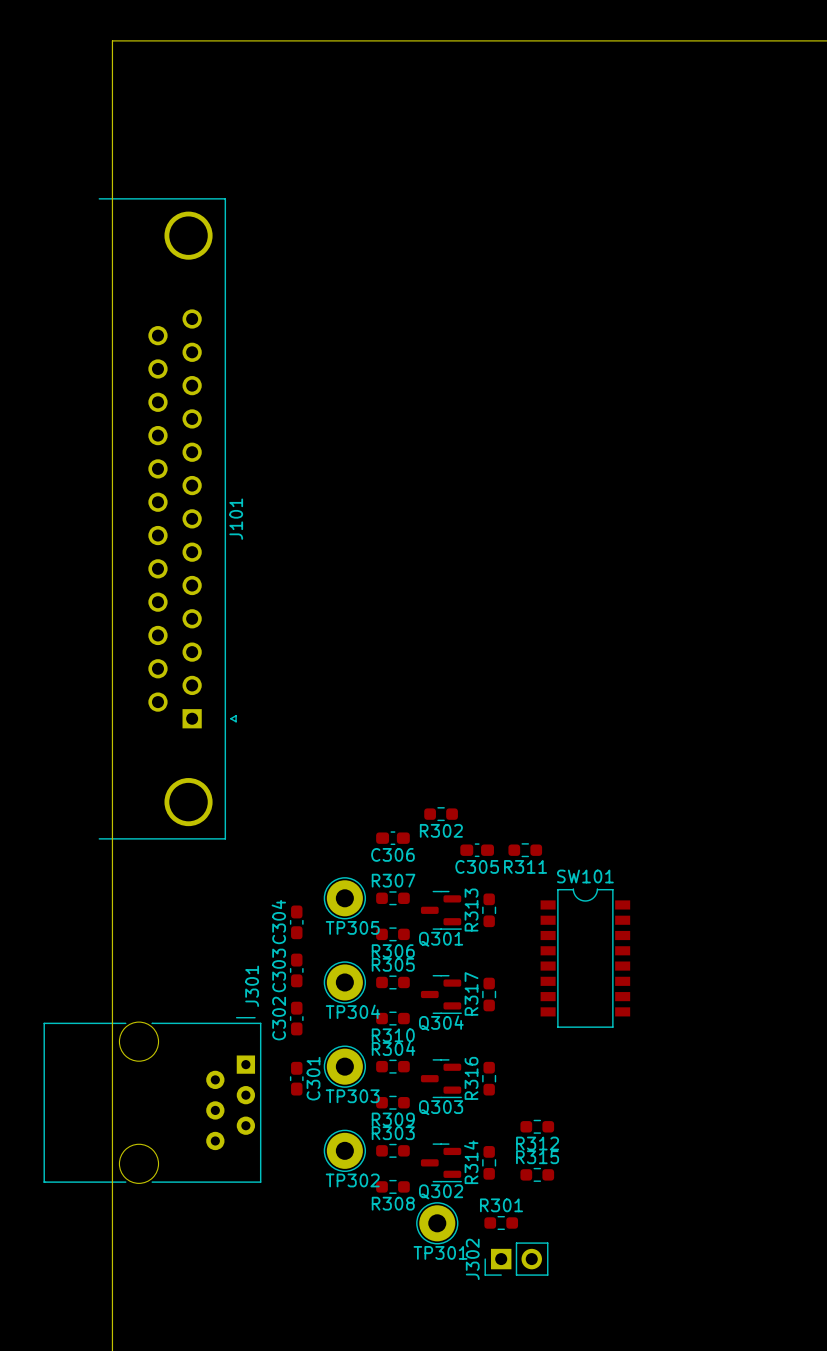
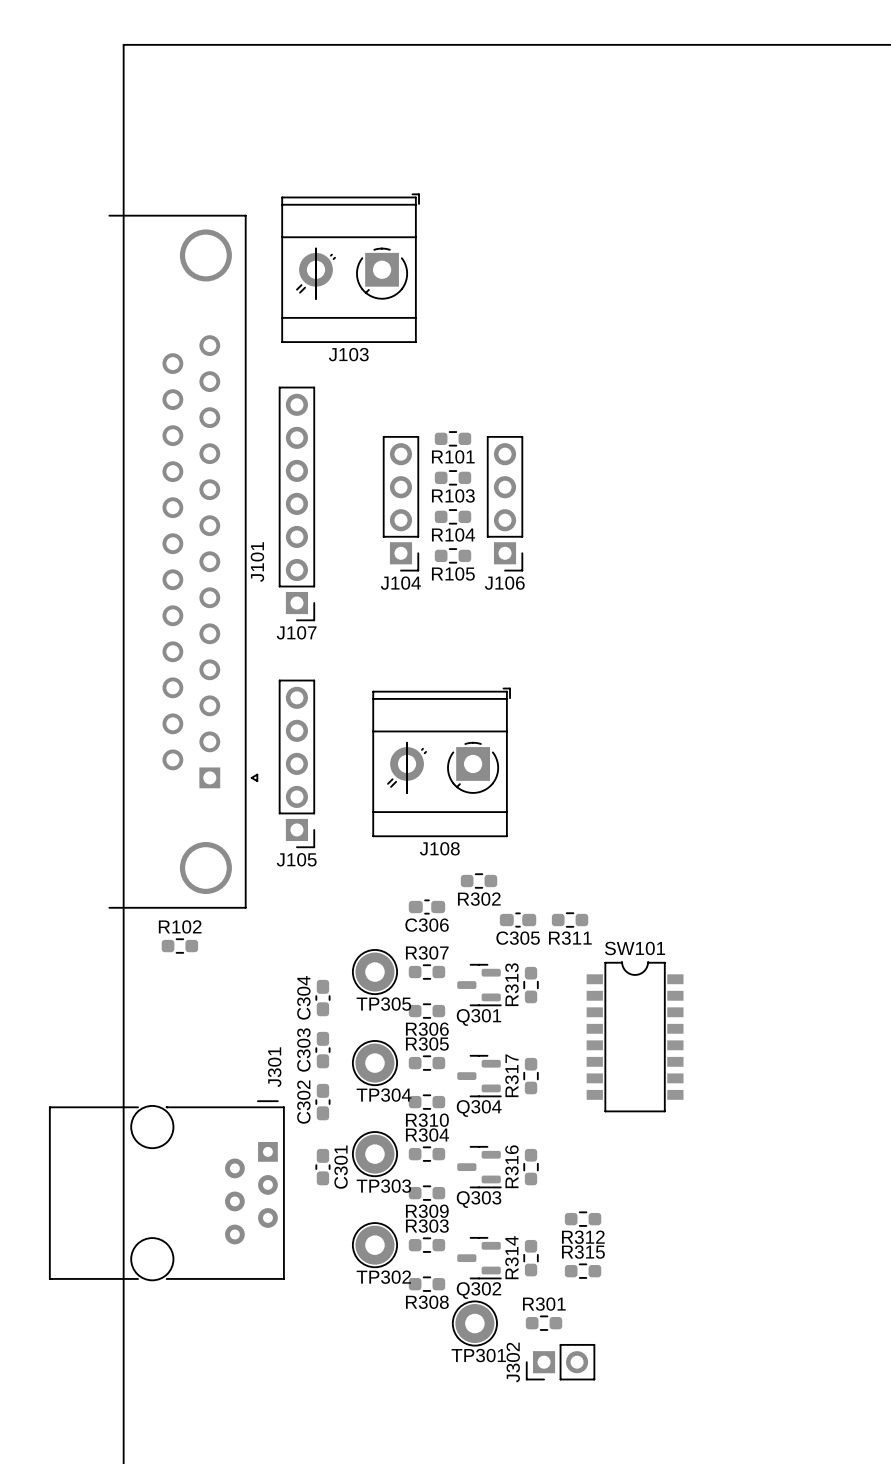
J103: none -> (350, 268)
R101: none -> (453, 438)
R103: none -> (453, 477)
J107: none -> (296, 503)
J104: none -> (400, 503)
J106: none -> (505, 503)
R104: none -> (453, 516)
R105: none -> (453, 555)
J108: none -> (441, 762)
J105: none -> (296, 763)
R102: none -> (179, 946)

